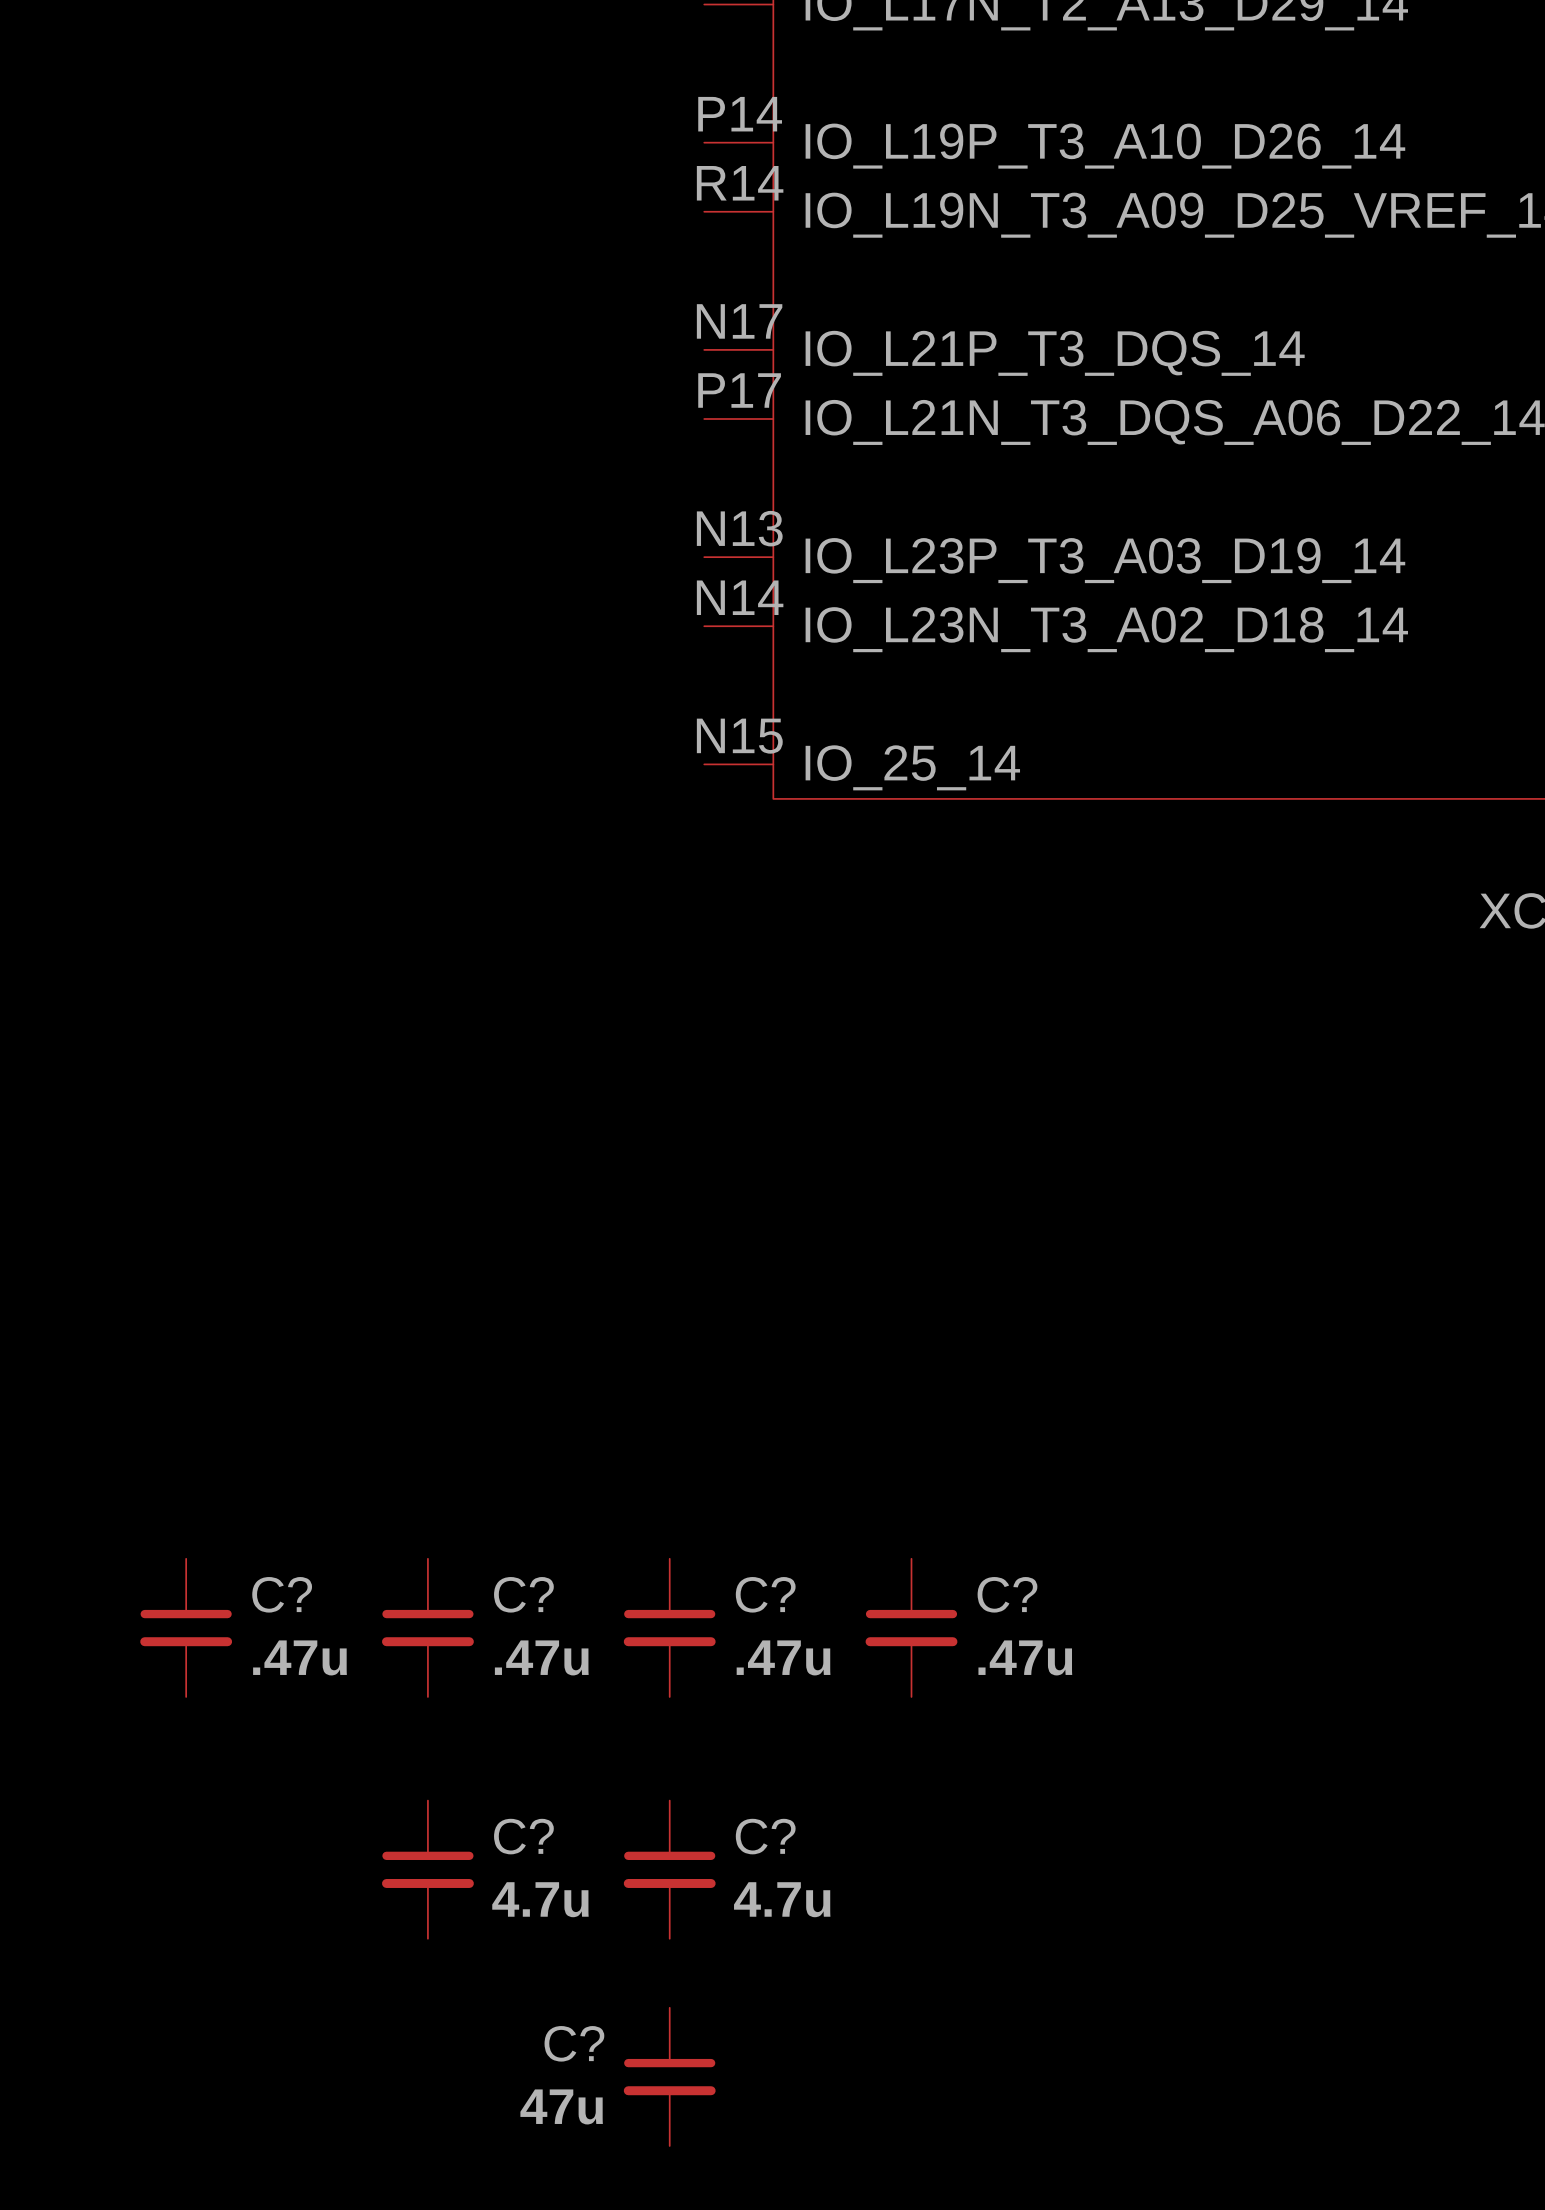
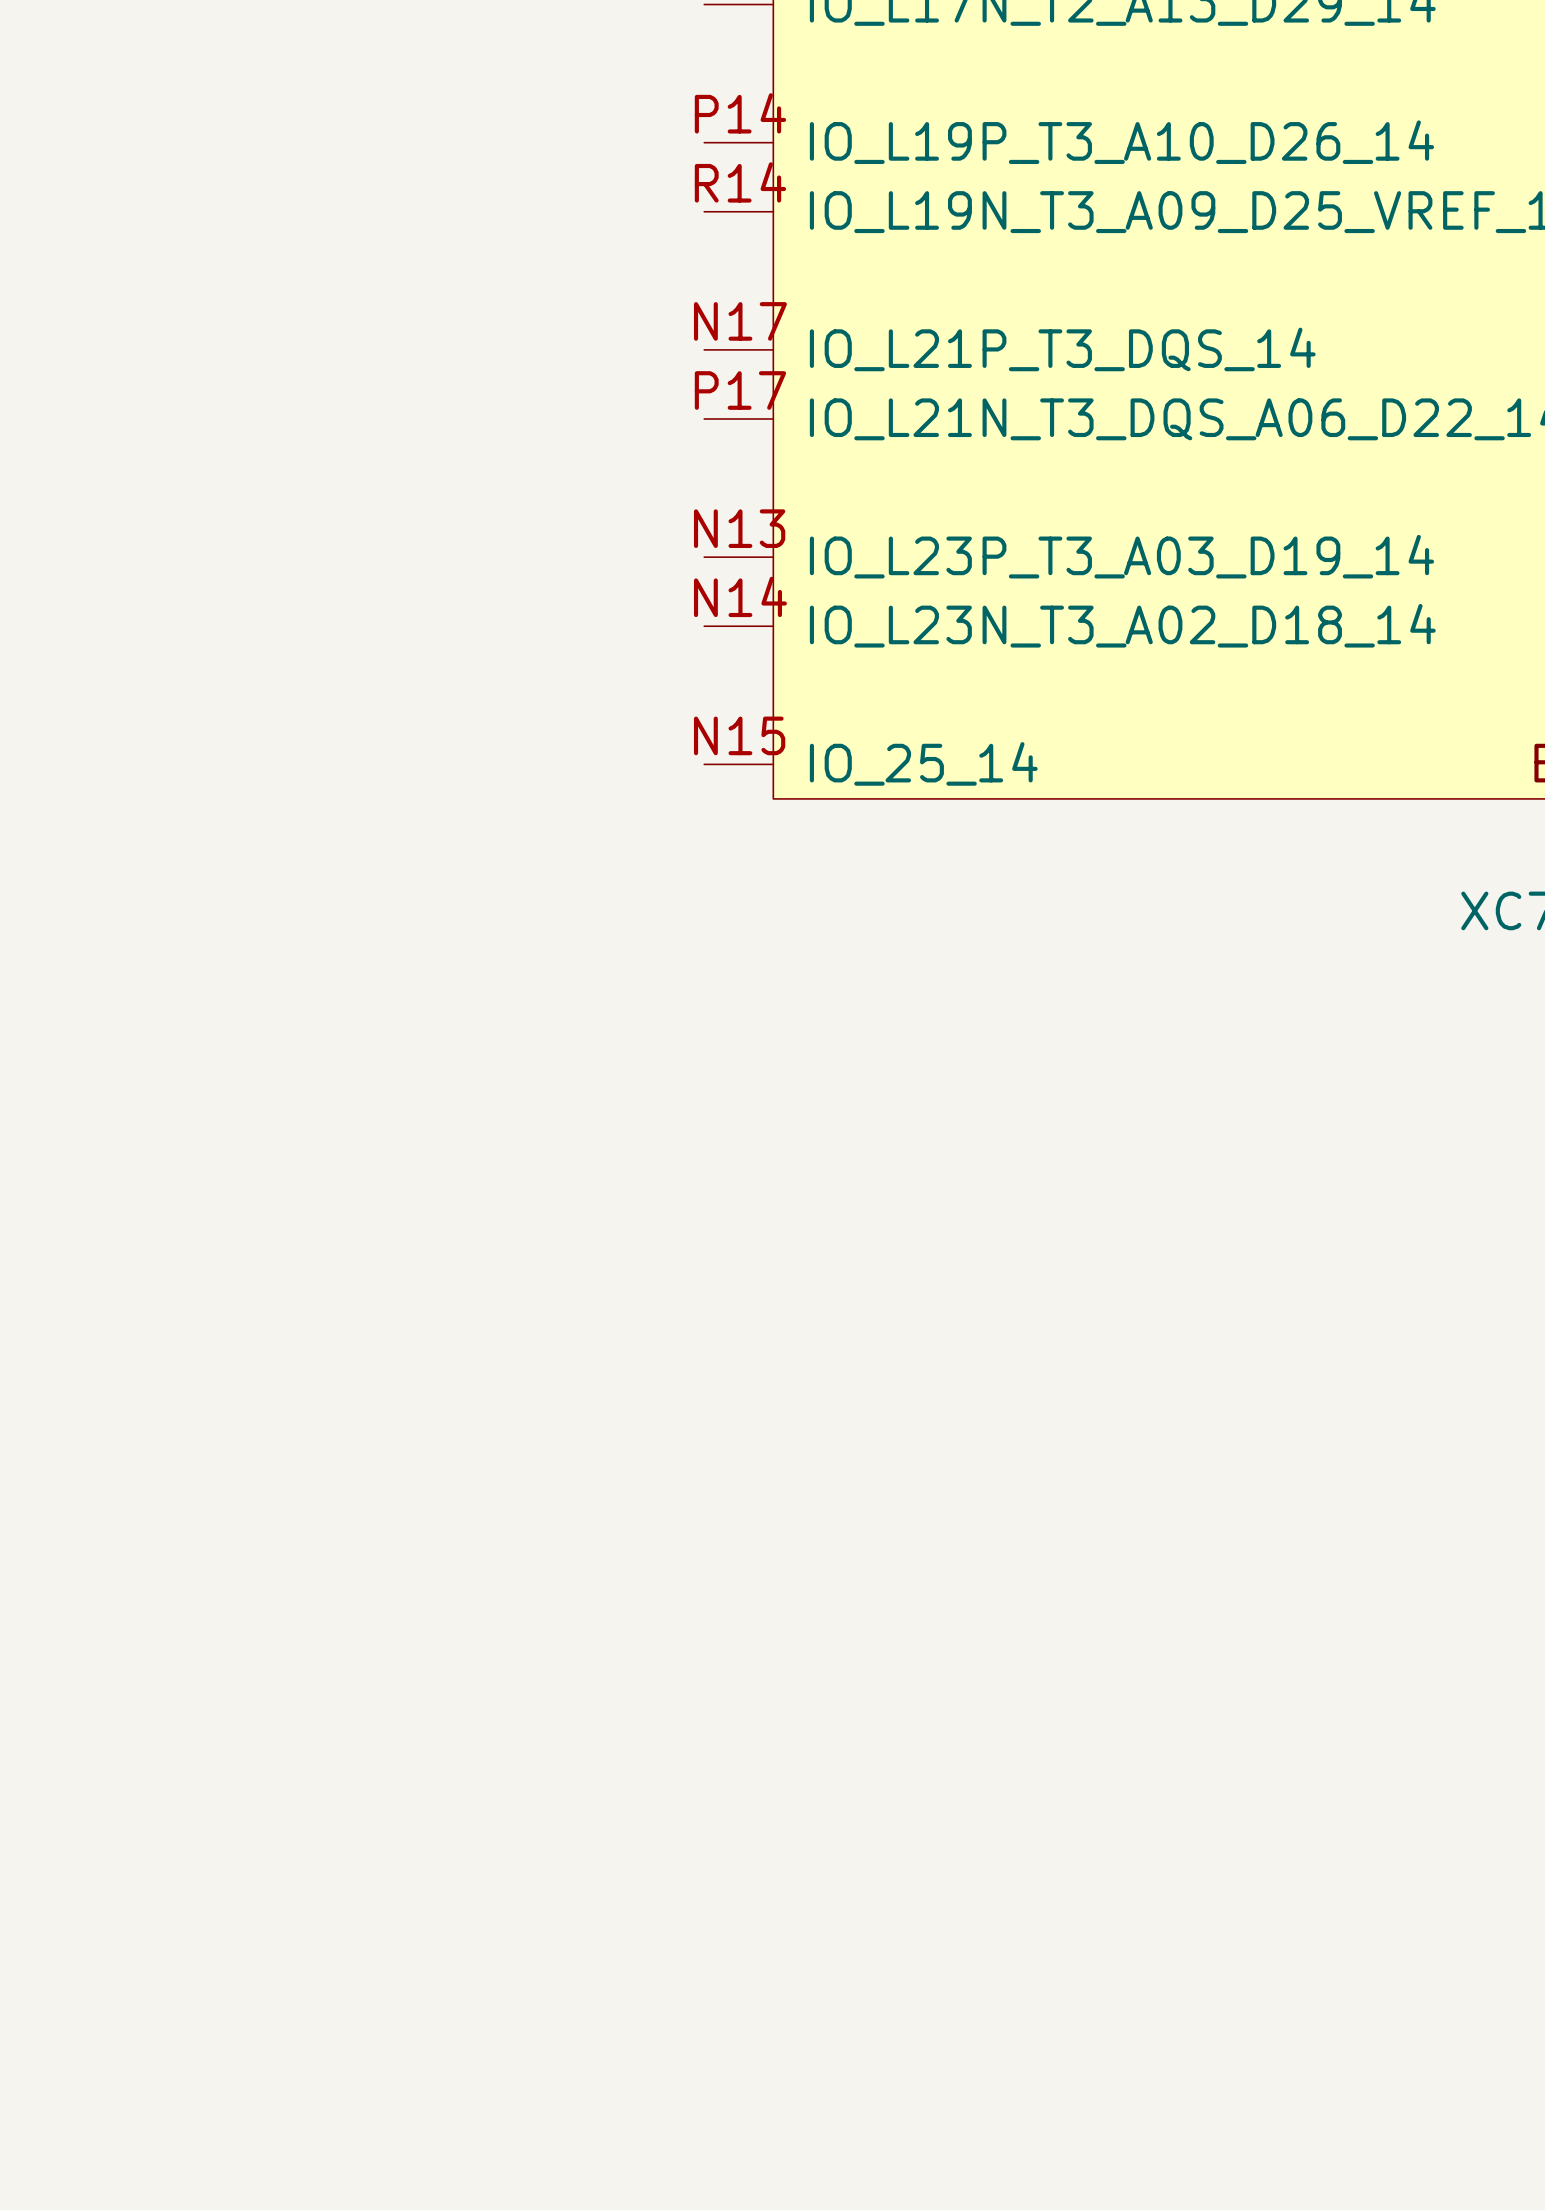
C?: .47u (186, 1627) -> none
C?: .47u (427, 1627) -> none
C?: .47u (669, 1627) -> none
C?: .47u (911, 1627) -> none
C?: 4.7u (427, 1869) -> none
C?: 4.7u (669, 1869) -> none
C?: 47u (669, 2076) -> none

